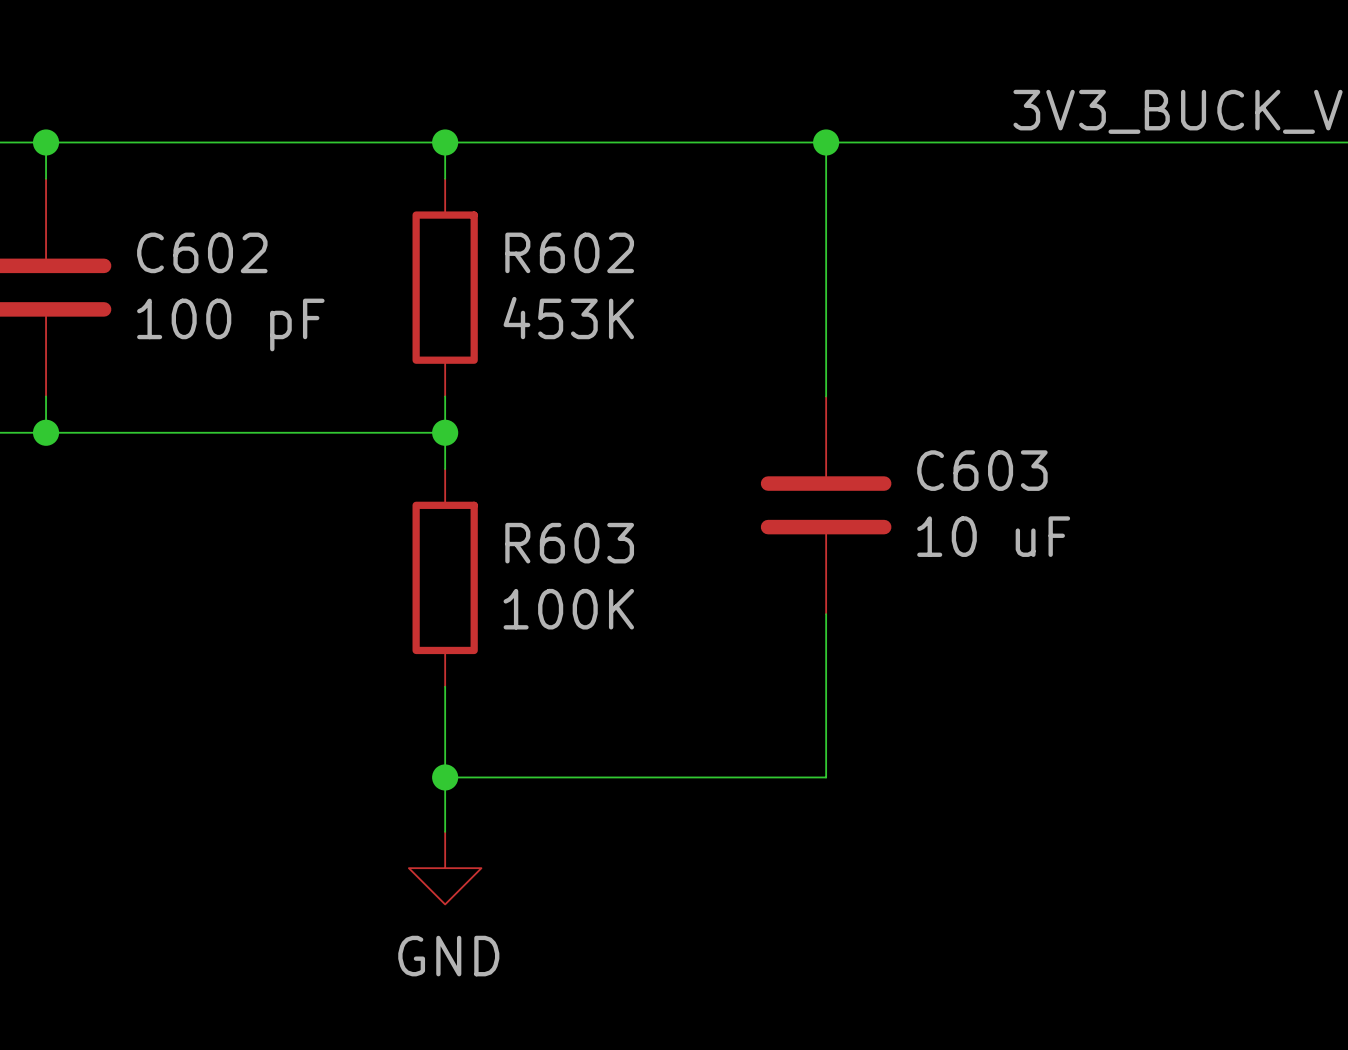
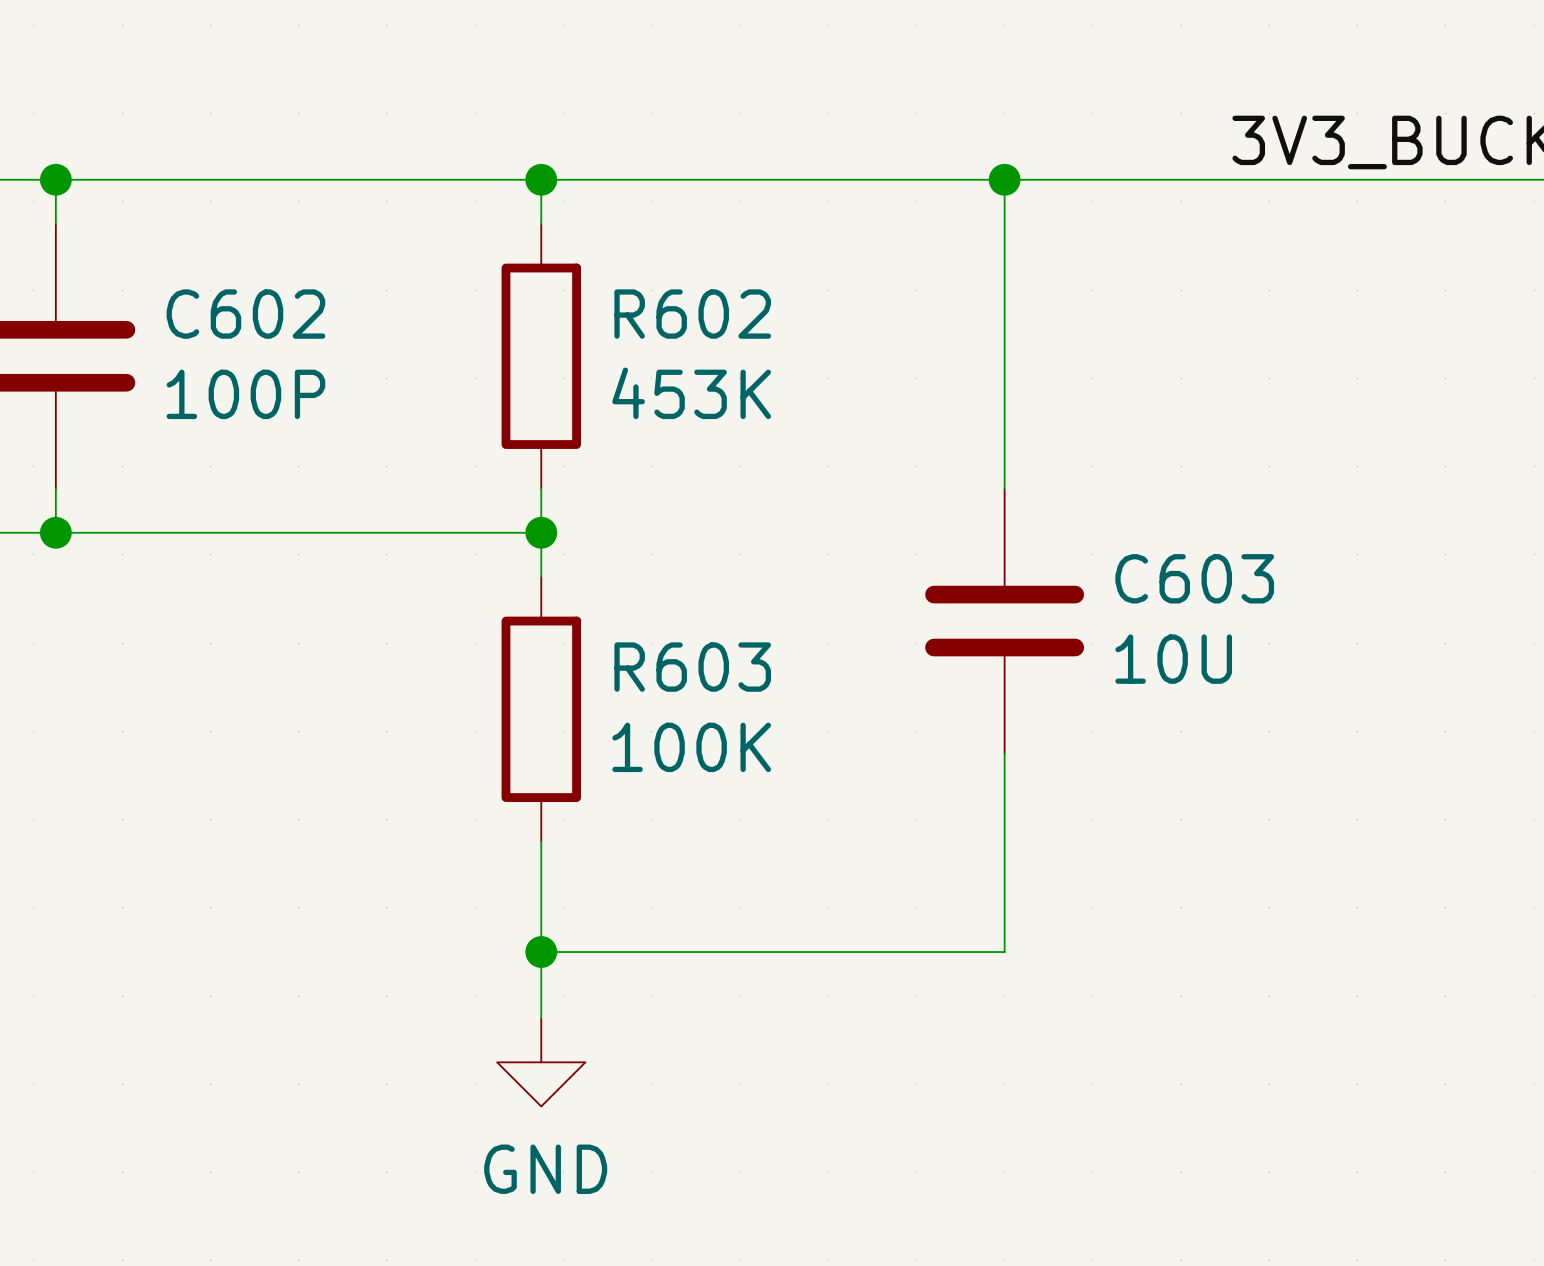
C602 value: 100 pF (230, 324) -> 100P (245, 394)
C603 value: 10 uF (993, 536) -> 10U (1173, 659)

